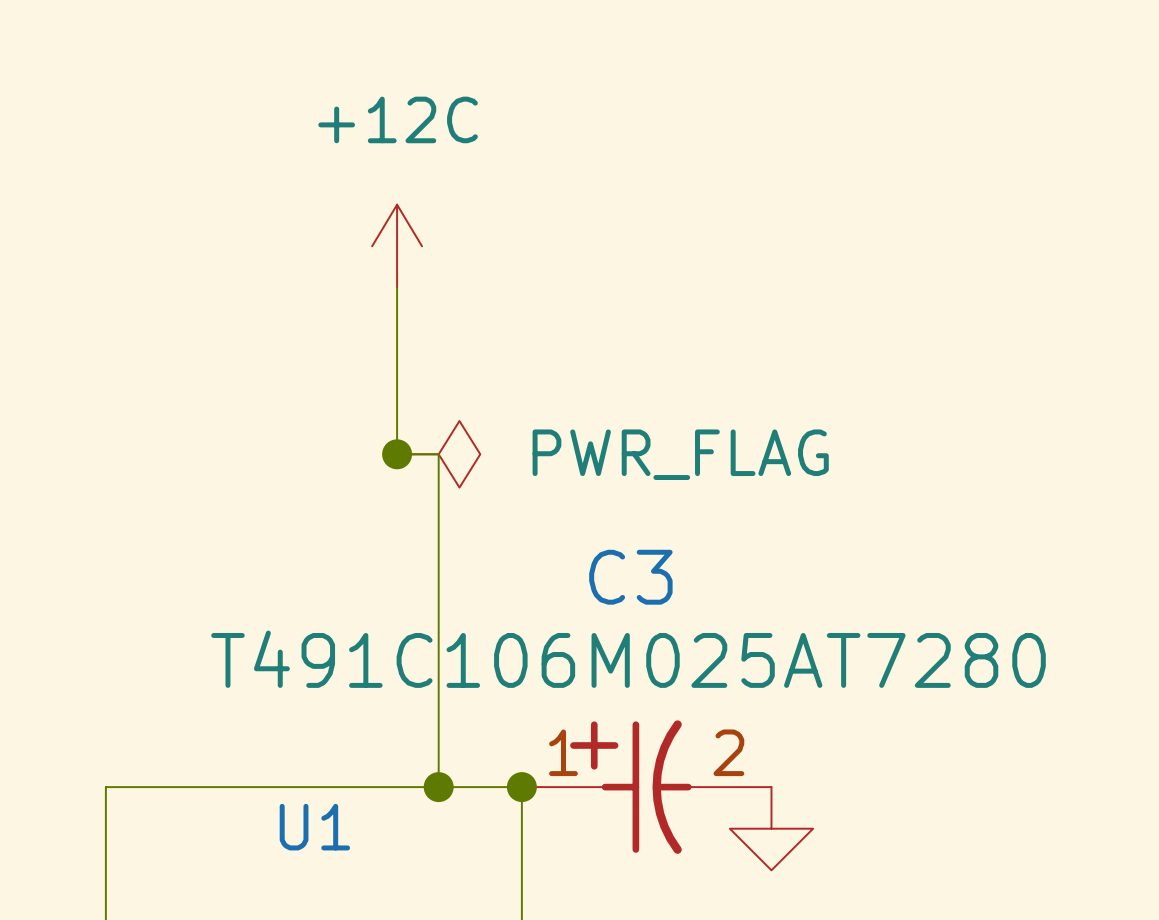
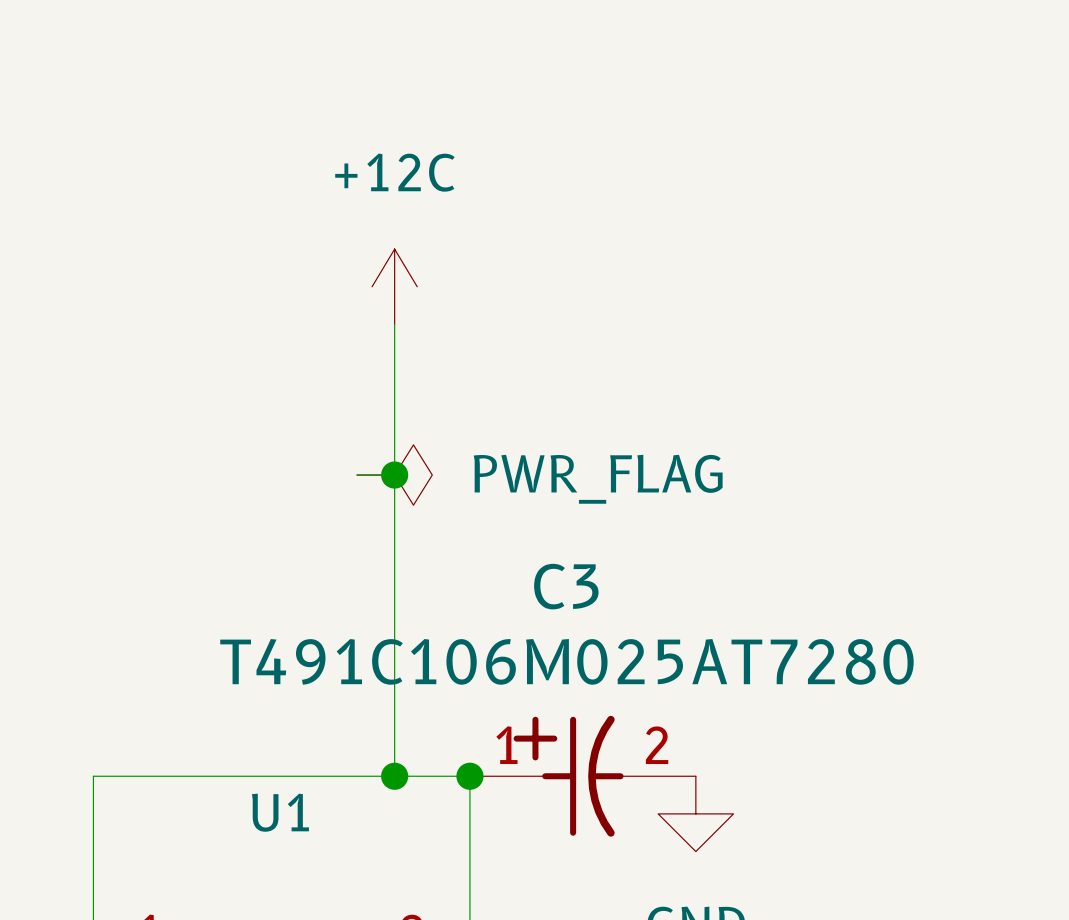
power symbol position: +12C (397, 246) -> +12C (394, 286)
wire: (397, 287) (397, 454) -> (394, 324) (394, 475)
junction position: (397, 454) -> (394, 475)

